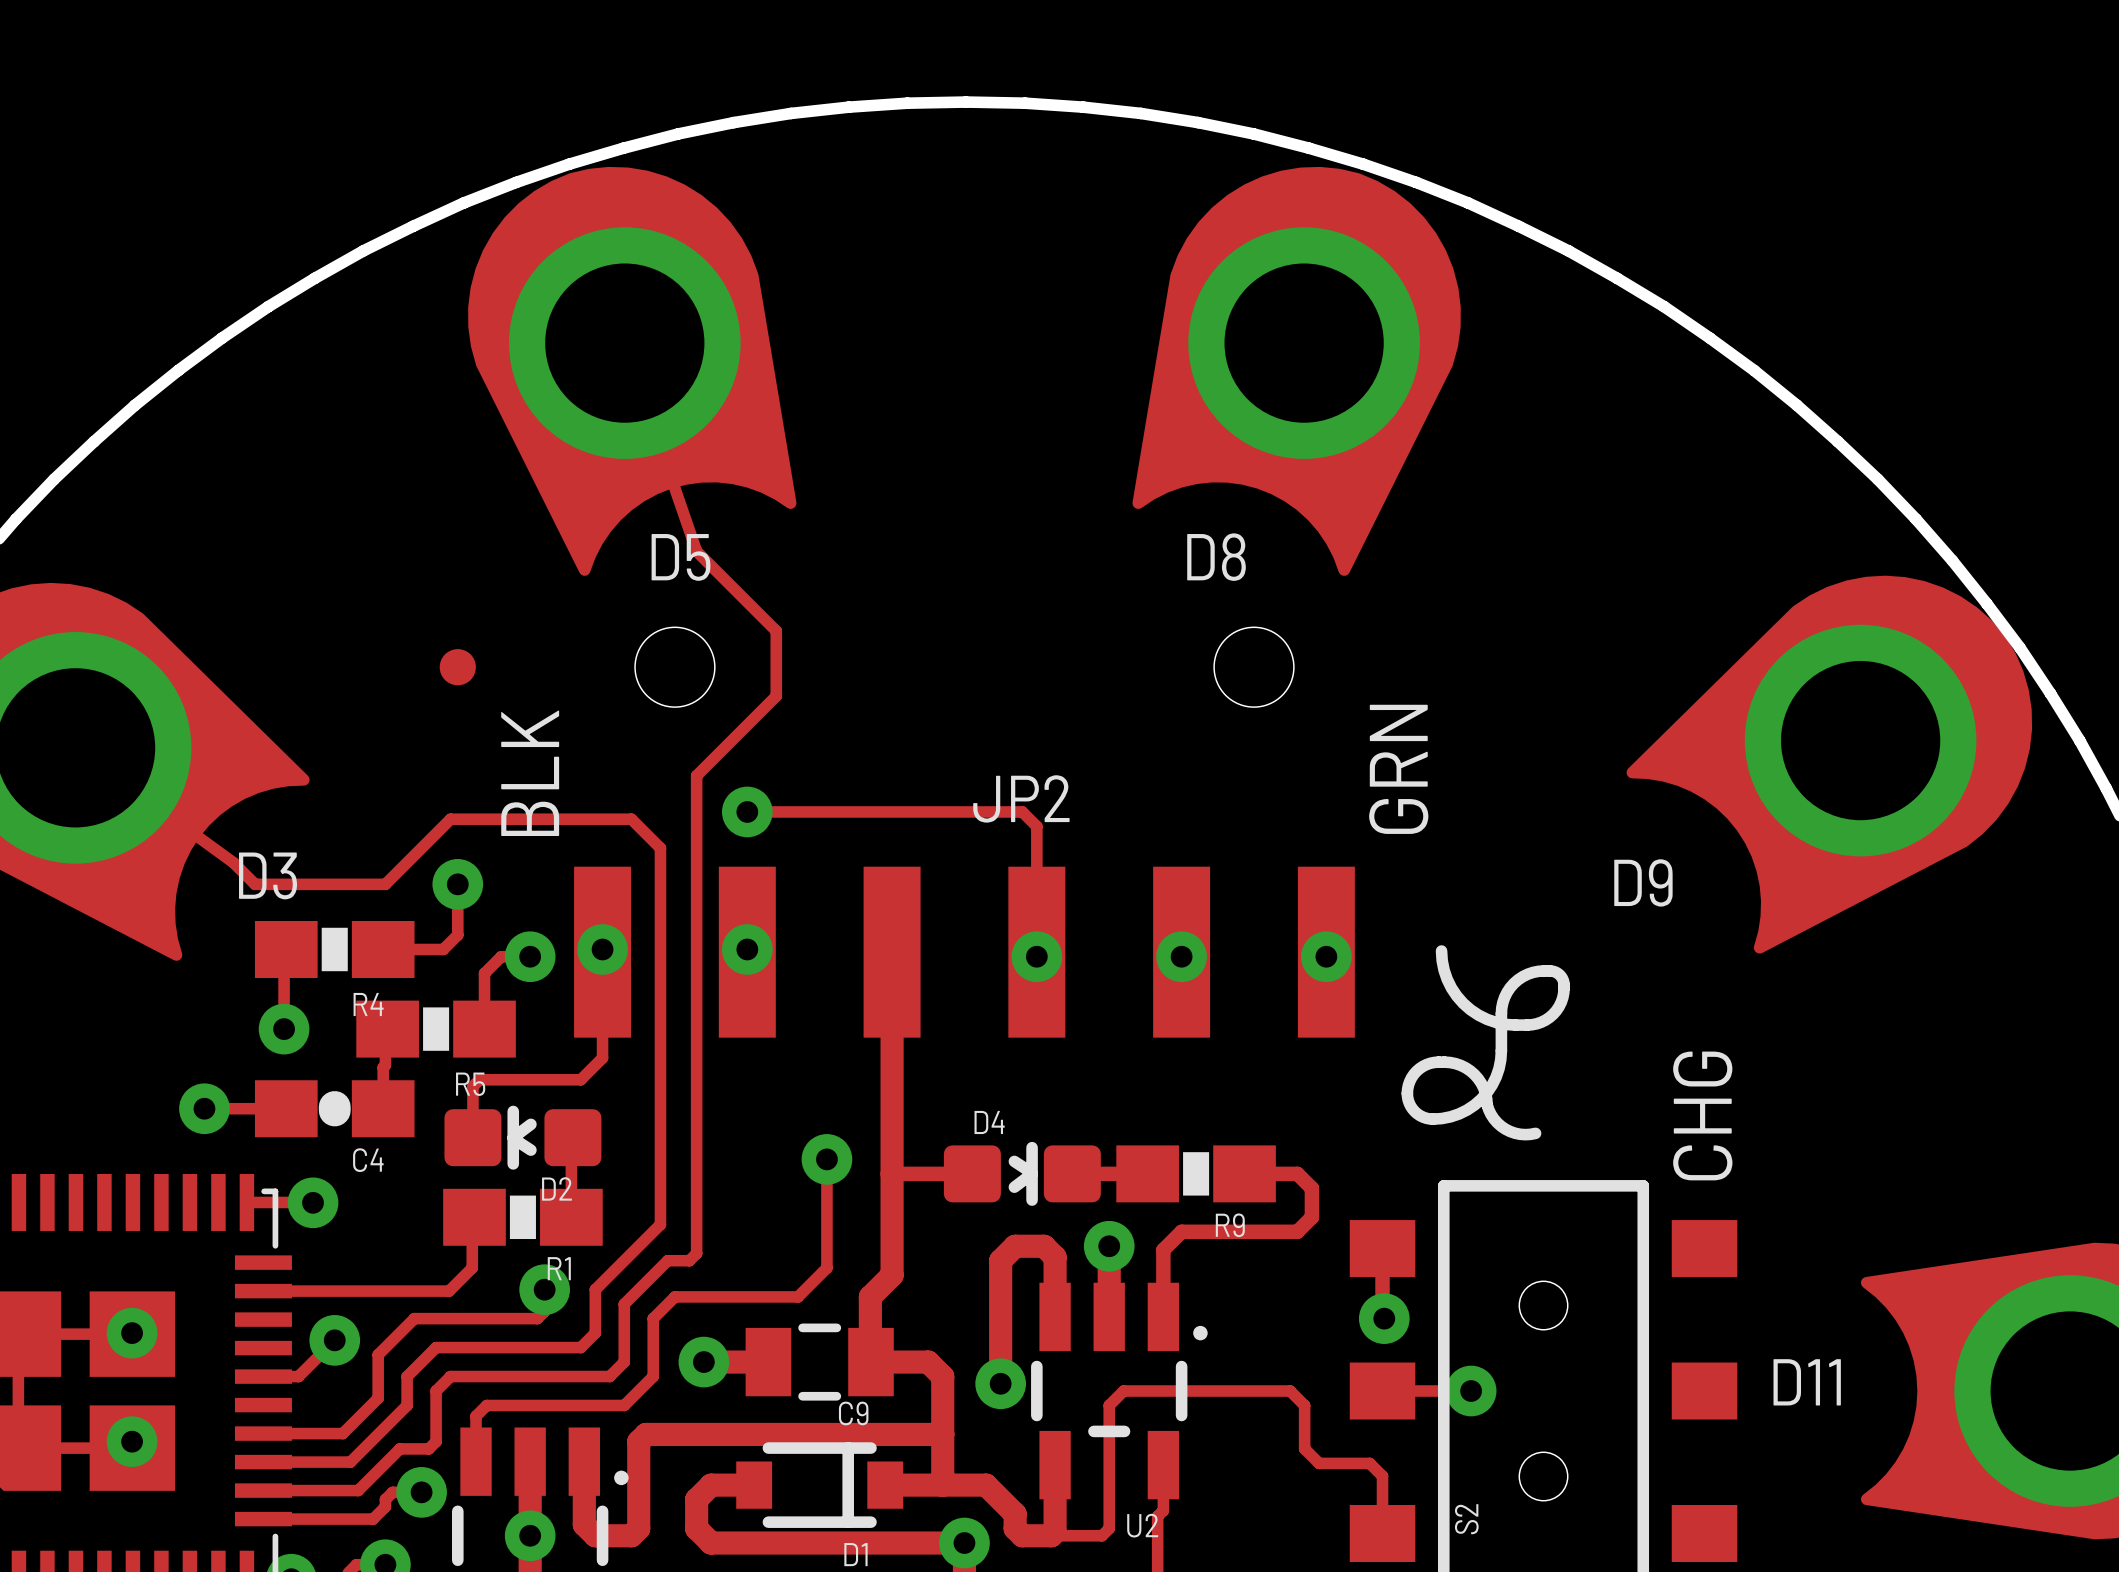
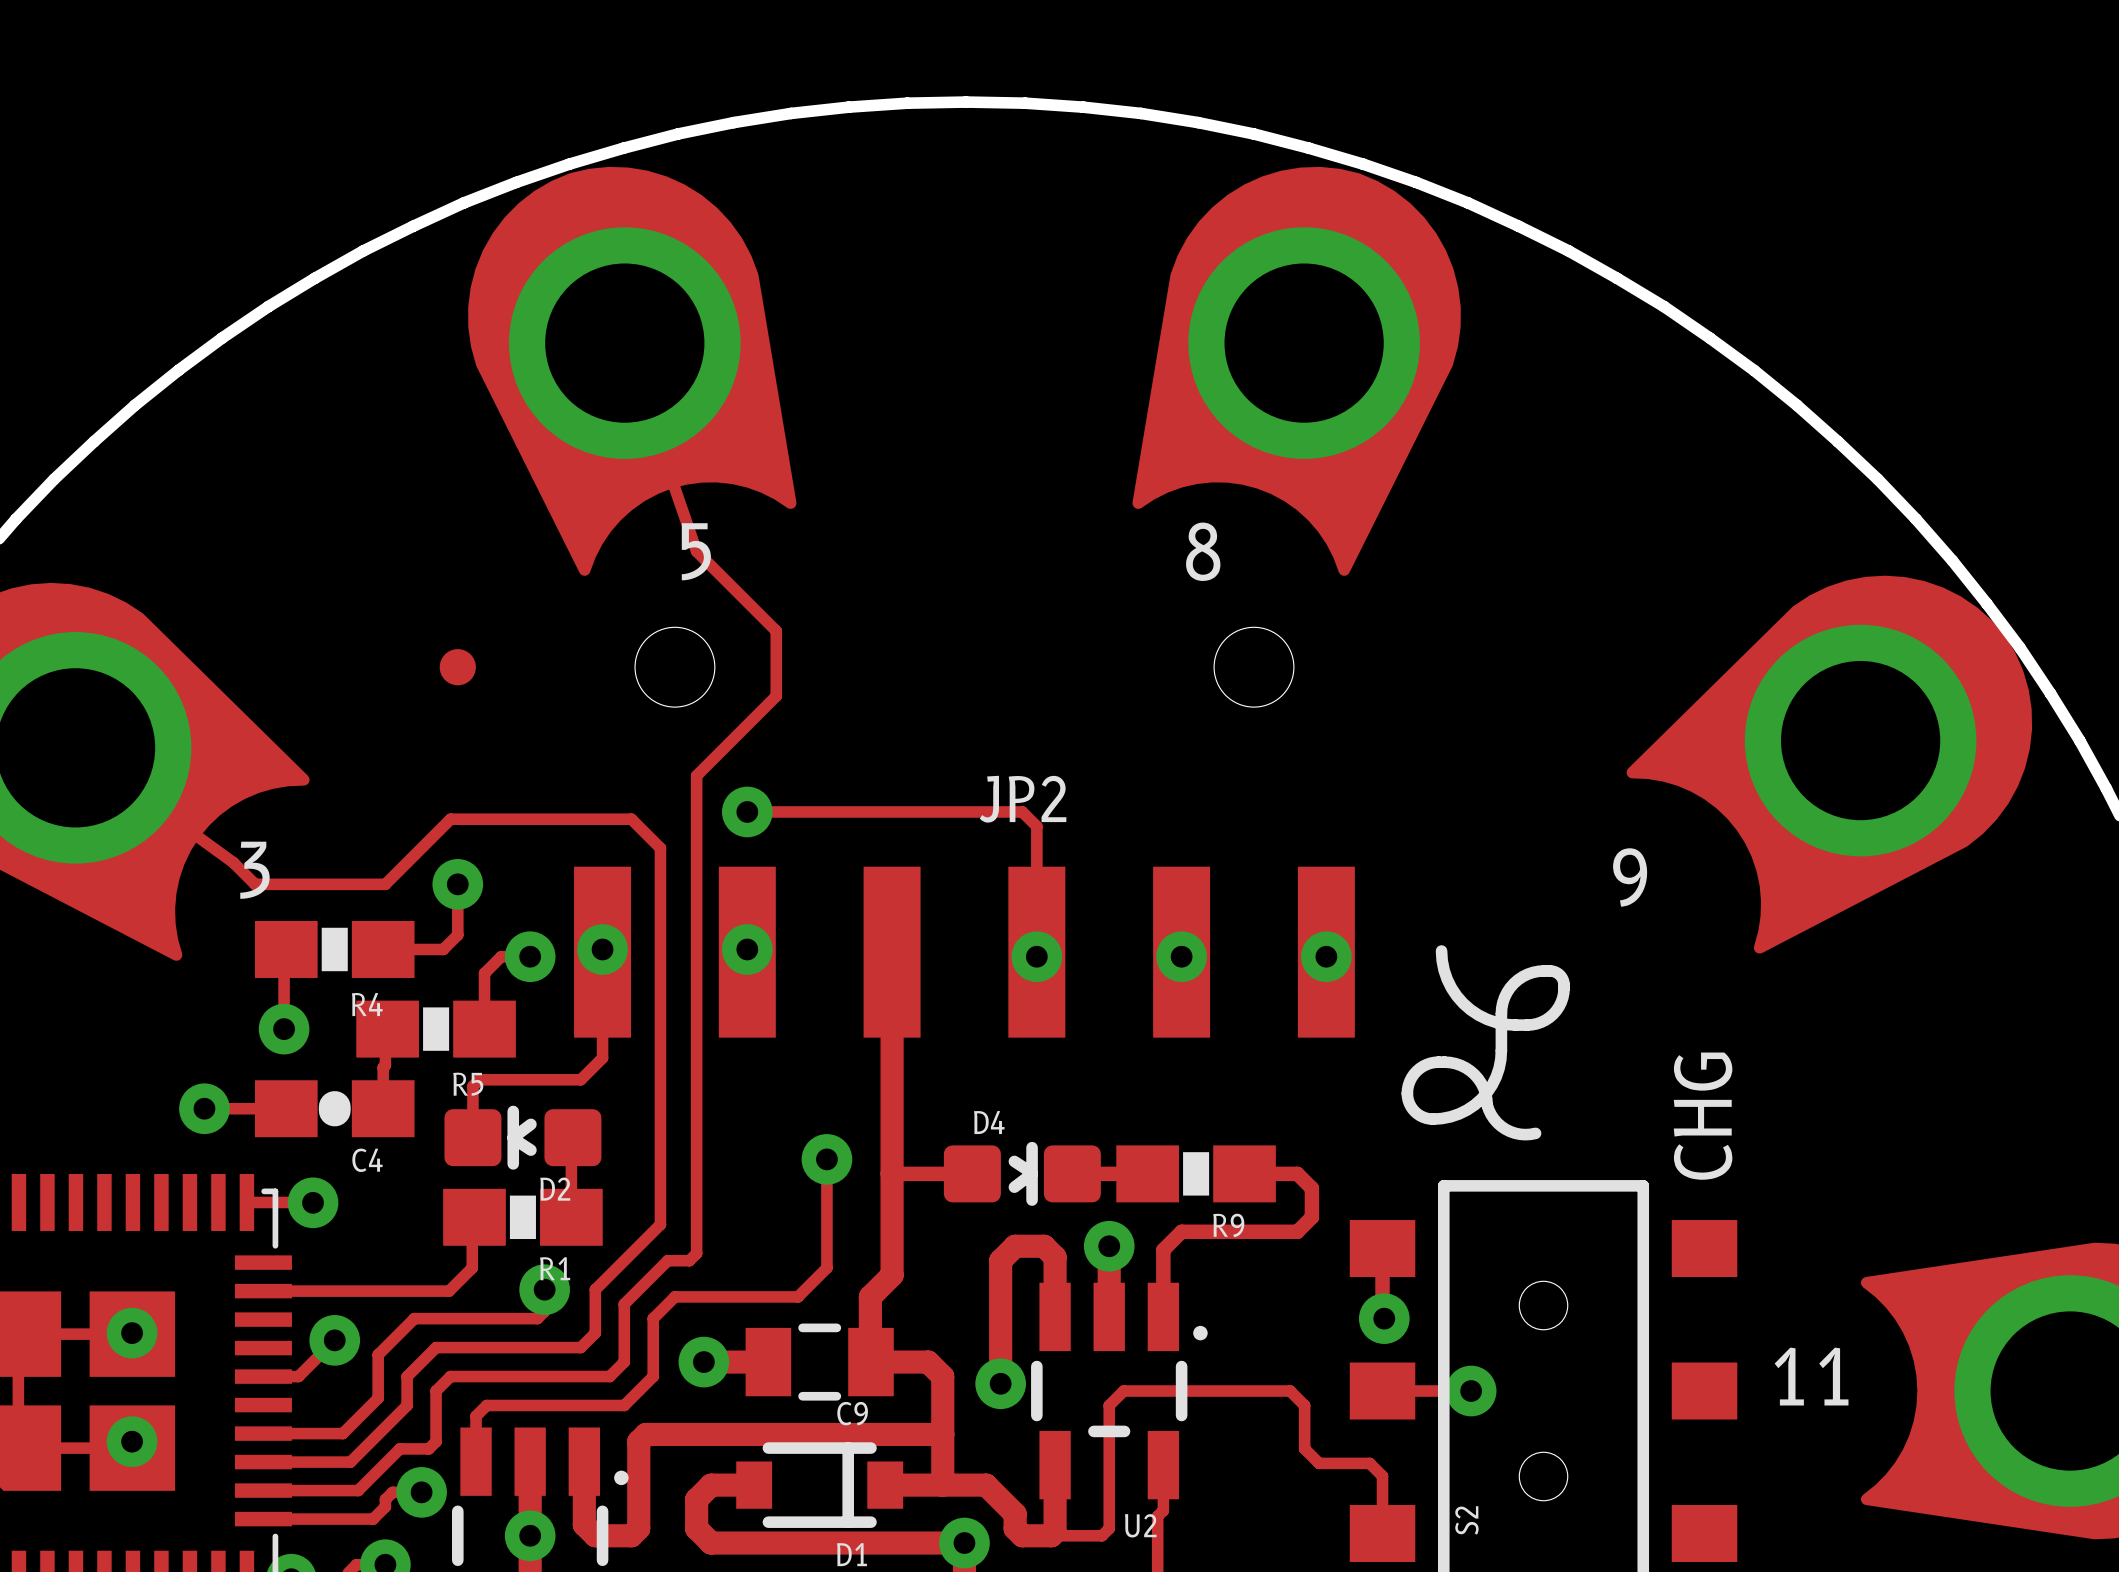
text: D5 (681, 557) -> 5 (696, 551)
text: D8 (1216, 557) -> 8 (1203, 551)
text: GRN (1398, 769) -> none
text: BLK (530, 773) -> none
text: D3 (268, 875) -> 3 (254, 870)
text: D9 (1643, 882) -> 9 (1630, 877)
text: D11 (1807, 1382) -> 11 (1811, 1376)

